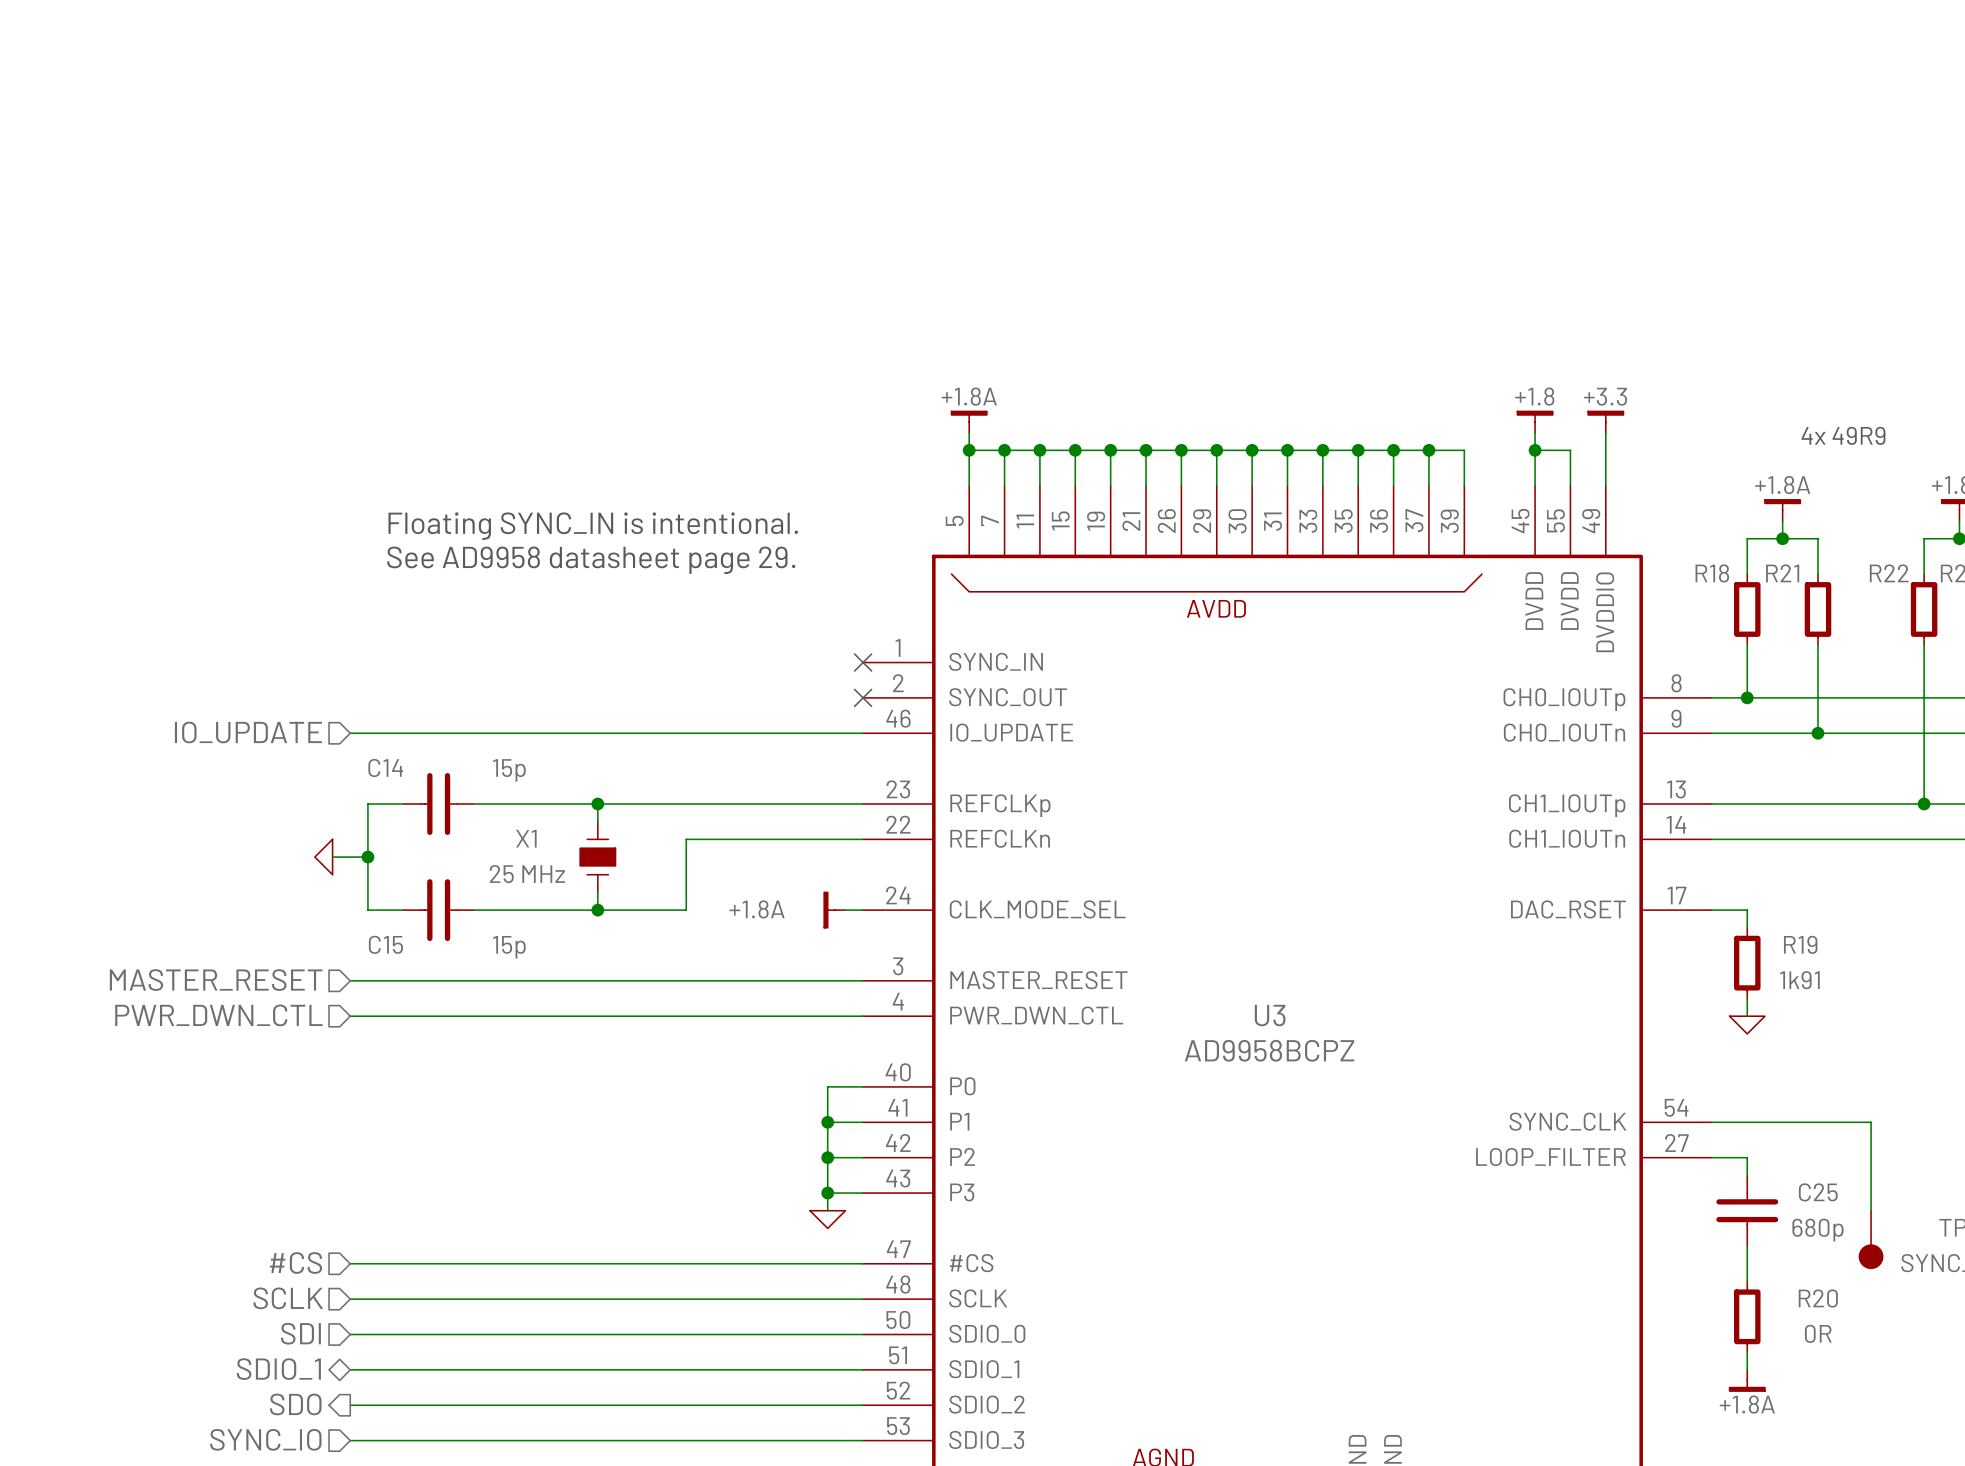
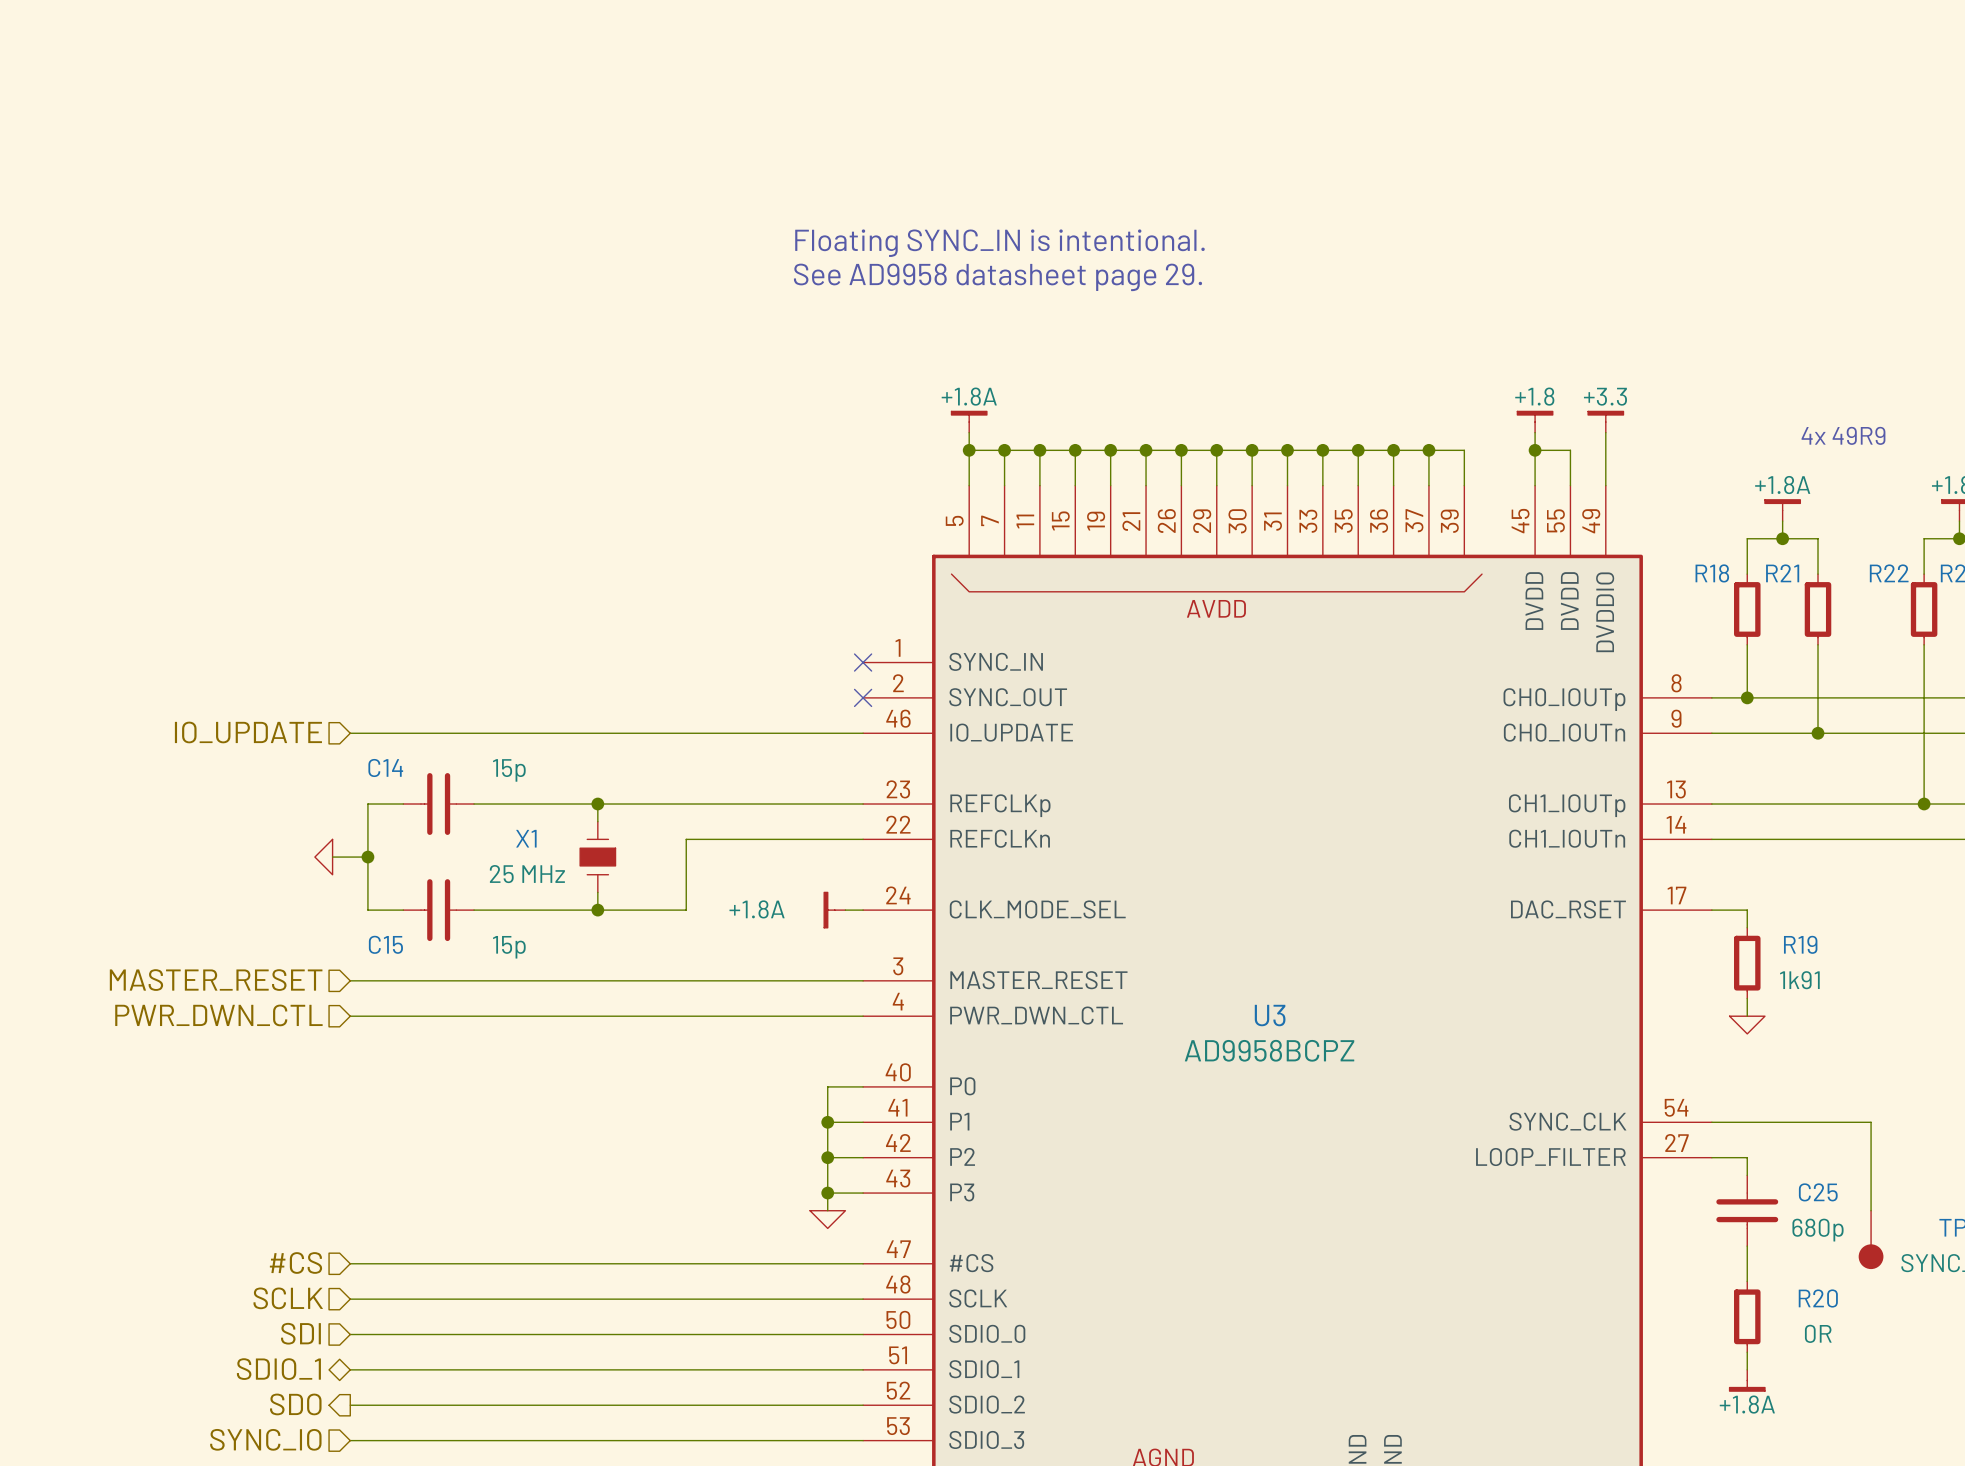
text: none -> Floating SYNC_IN is intentional. (999, 243)
text: none -> See AD9958 datasheet page 29. (998, 277)
text: Floating SYNC_IN is intentional. (593, 526) -> none
text: See AD9958 datasheet page 29. (591, 560) -> none

